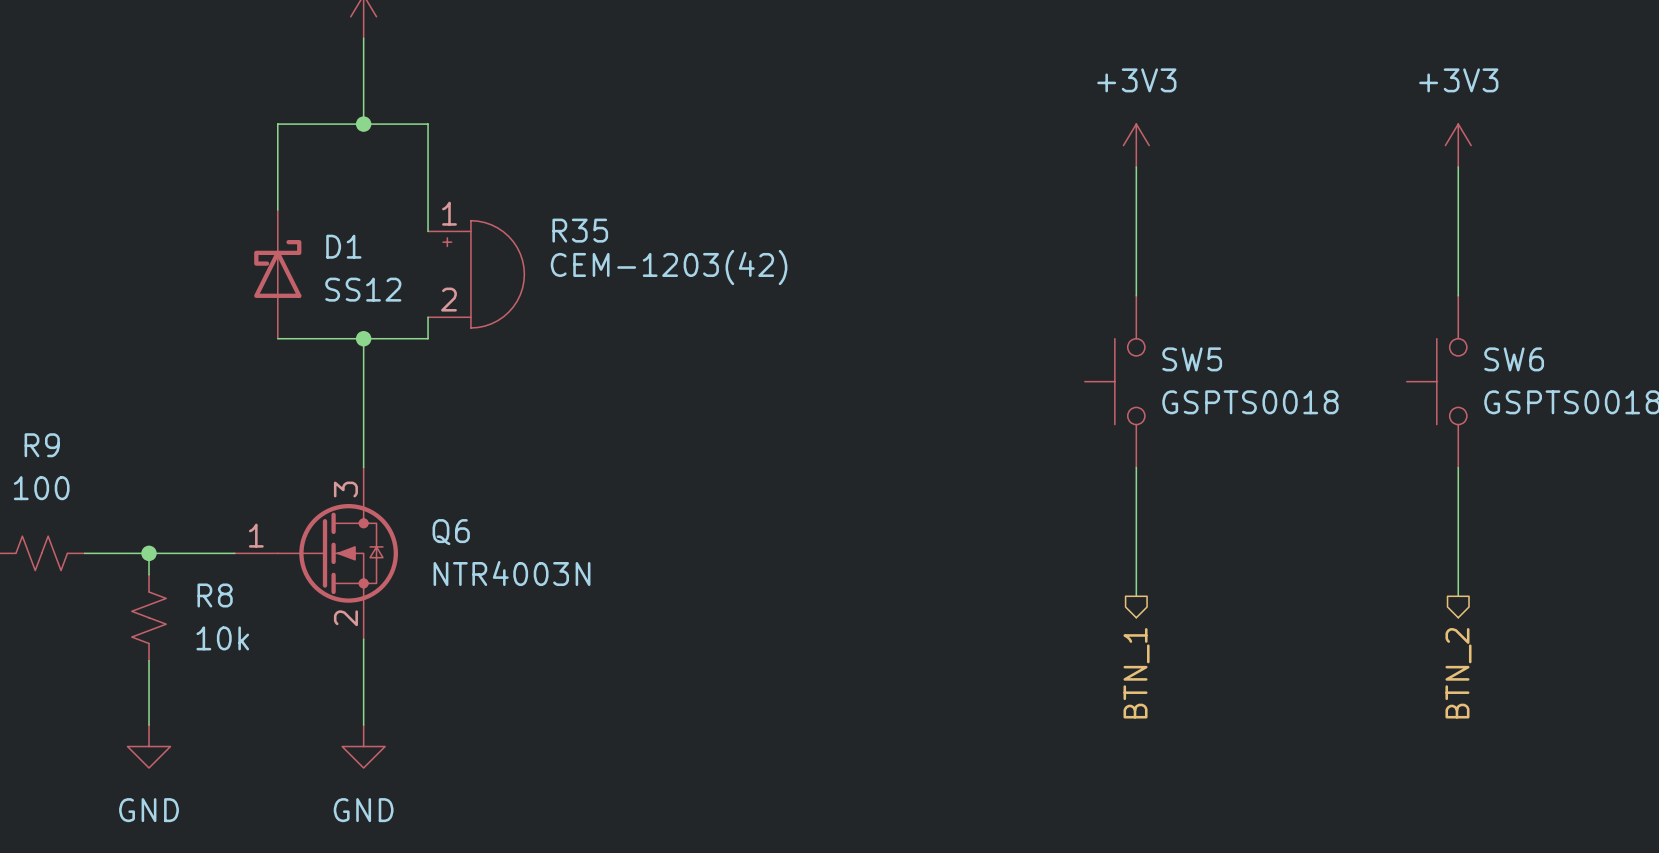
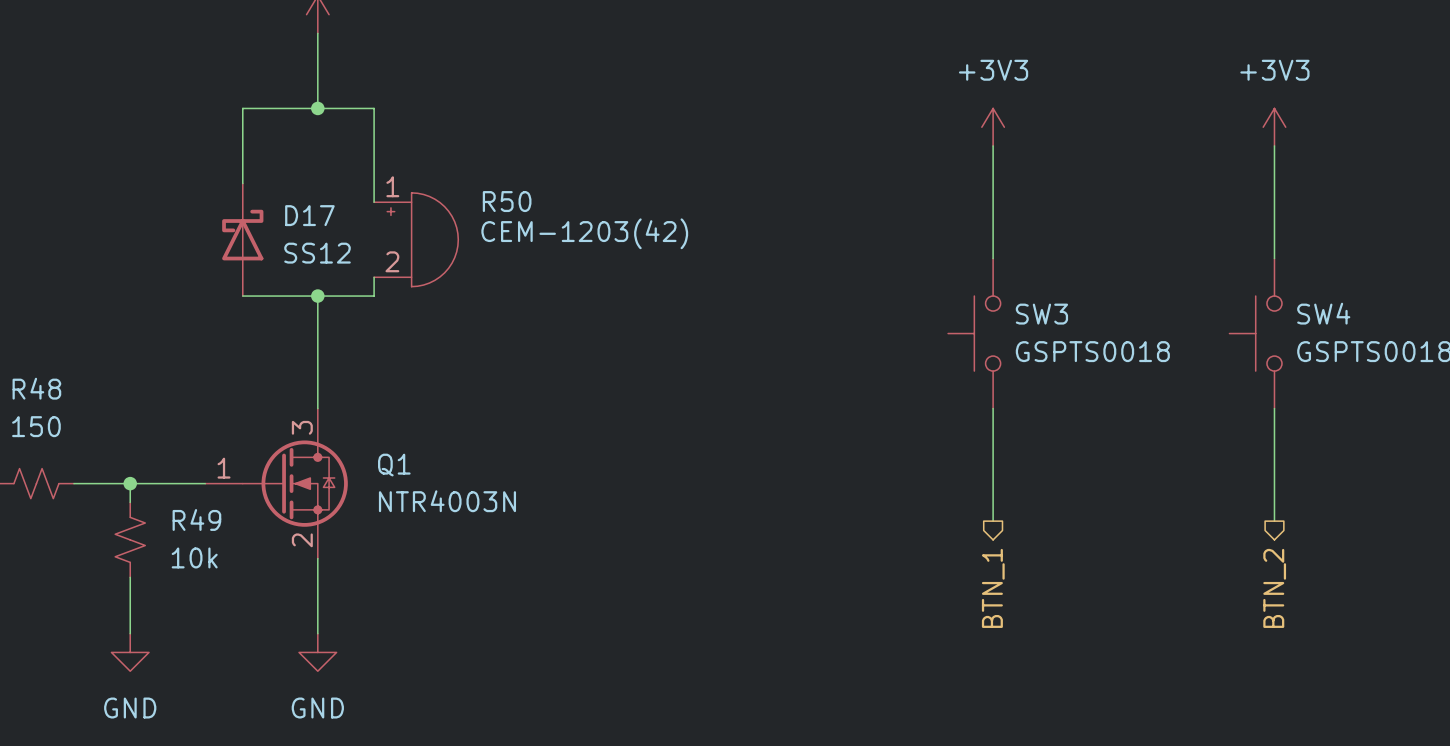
R35 name: R35 (580, 230) -> R50 (507, 201)
D1 name: D1 (343, 246) -> D17 (309, 215)
SW5 name: SW5 (1192, 359) -> SW3 (1041, 314)
SW6 name: SW6 (1514, 359) -> SW4 (1323, 313)
R9 name: R9 (42, 445) -> R48 (36, 388)
R9 value: 100 (41, 488) -> 150 (36, 426)
Q6 name: Q6 (451, 532) -> Q1 (394, 465)
R8 name: R8 (215, 595) -> R49 (196, 519)

